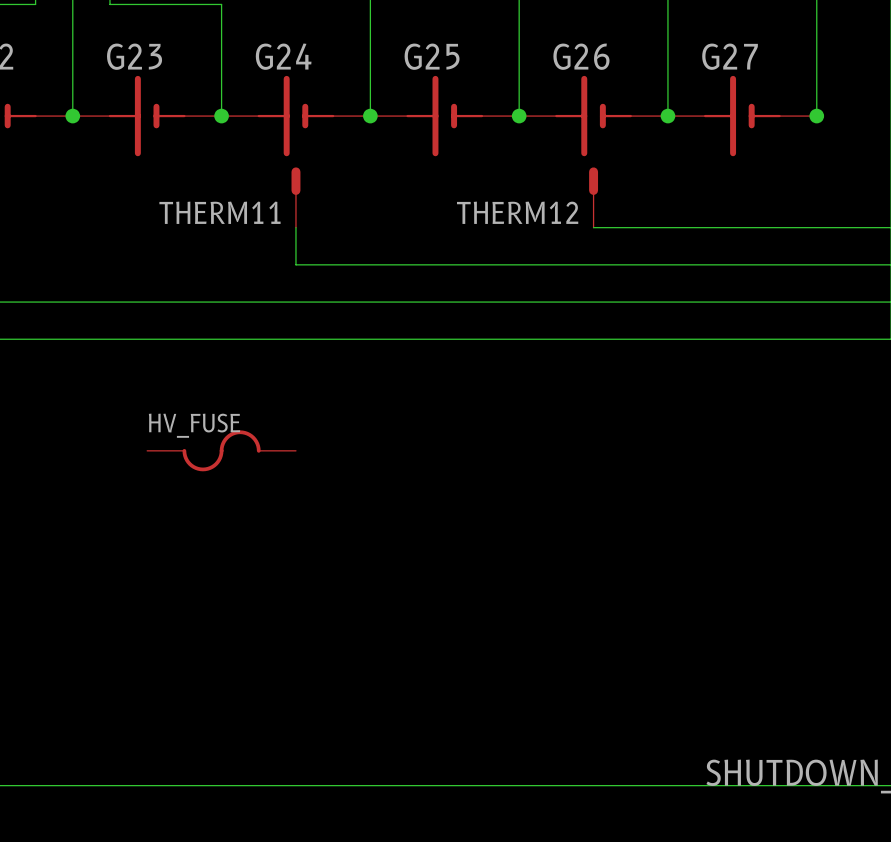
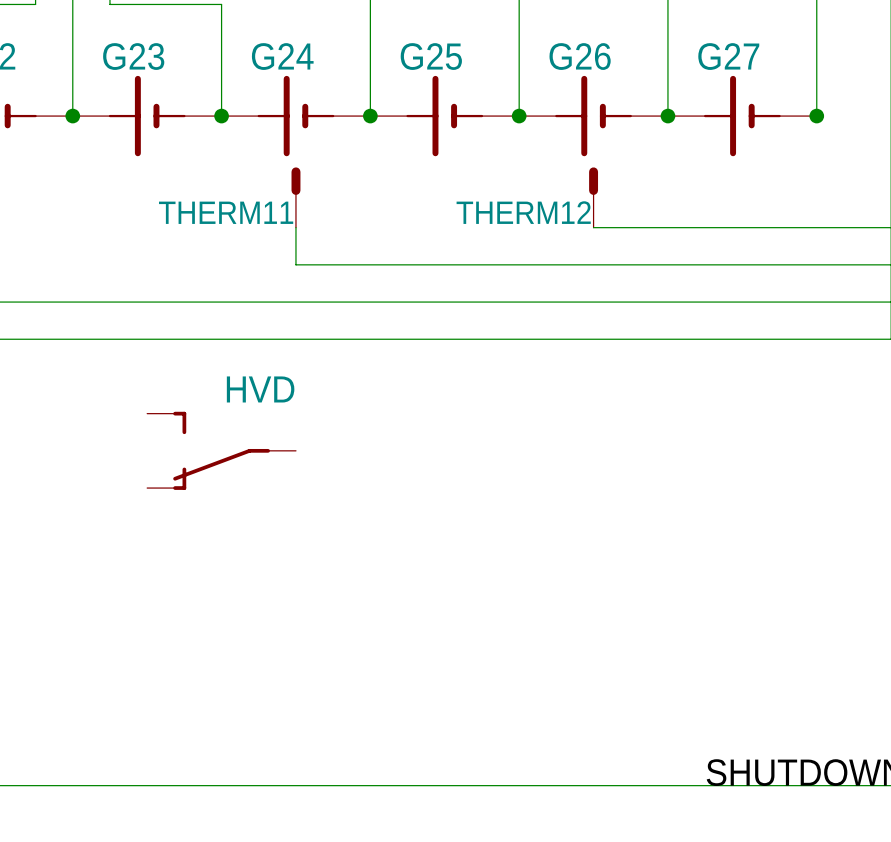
HV_FUSE: (221, 450) -> none
HVD: none -> (221, 450)

